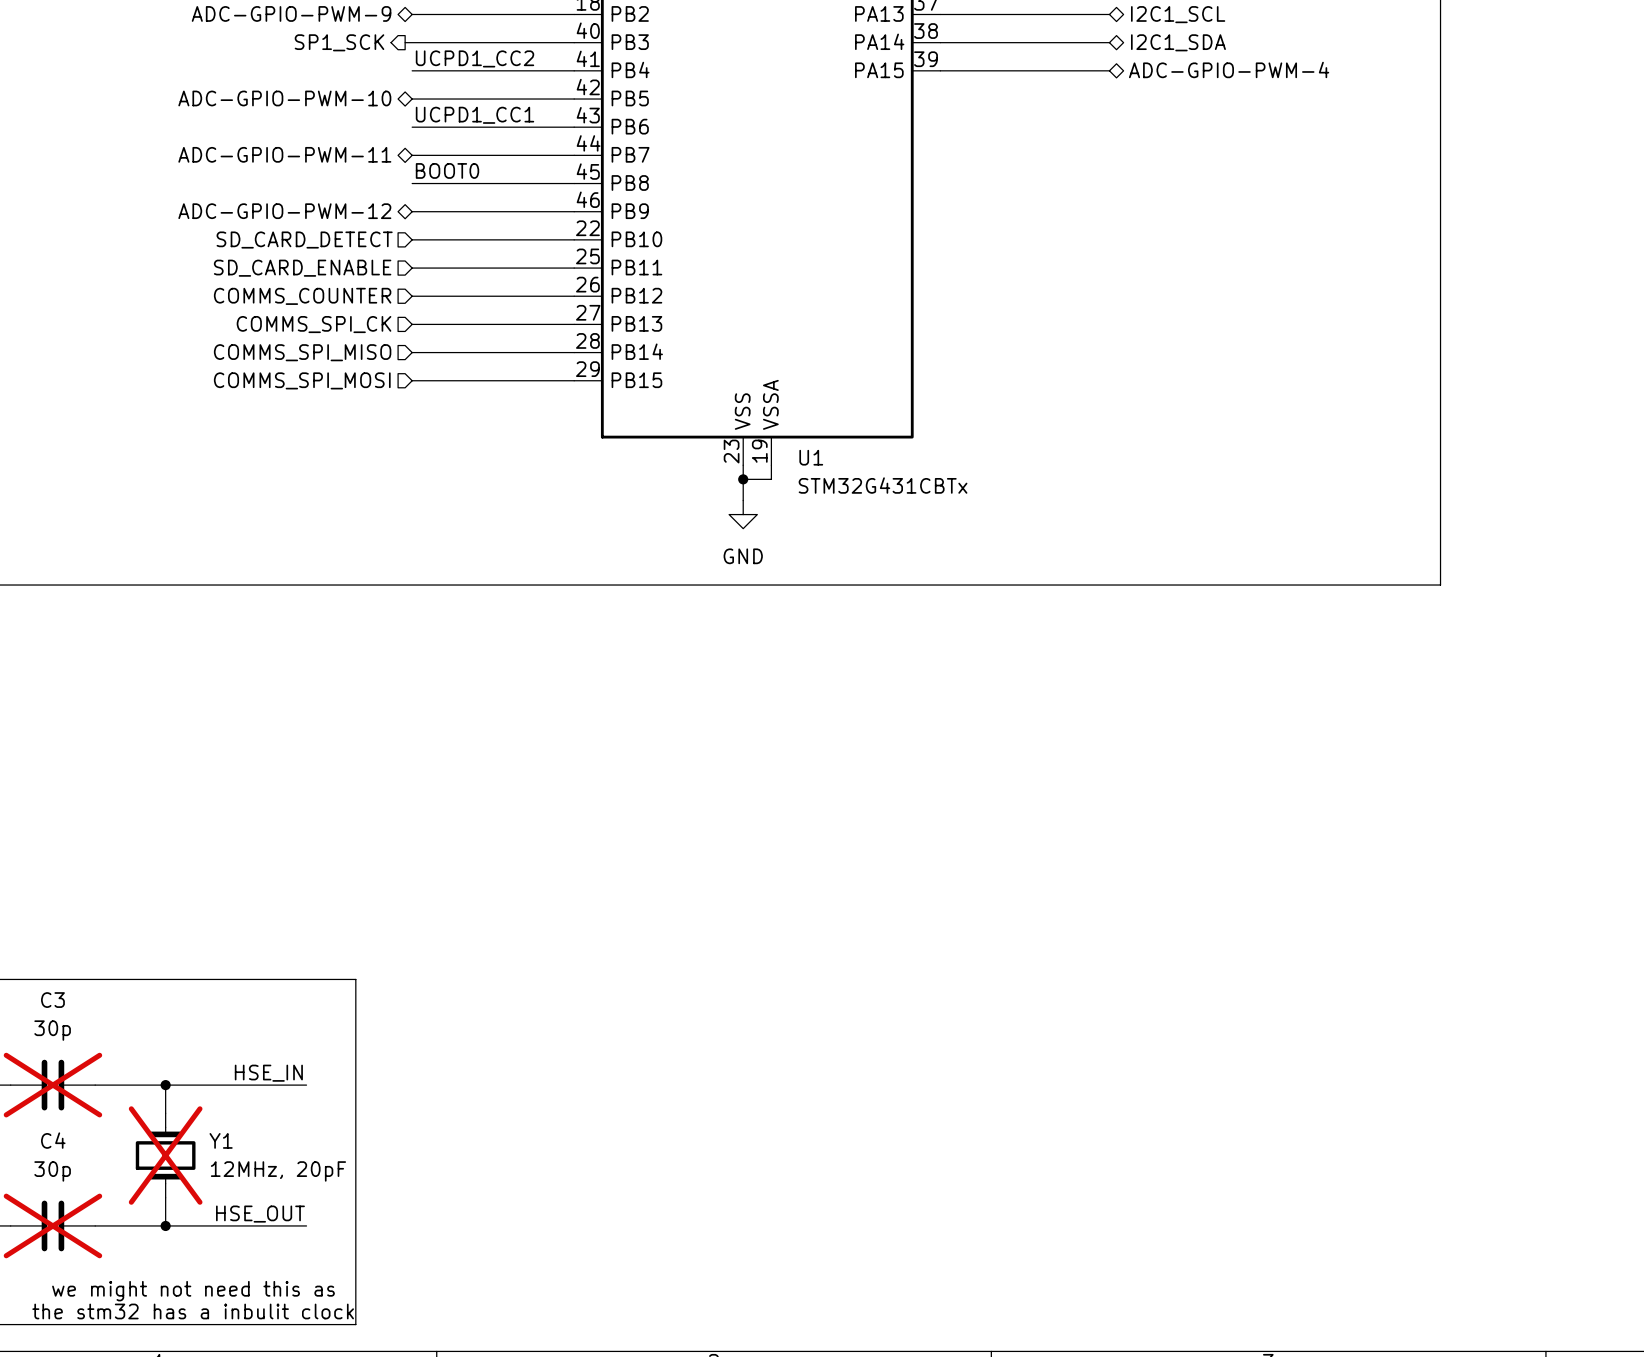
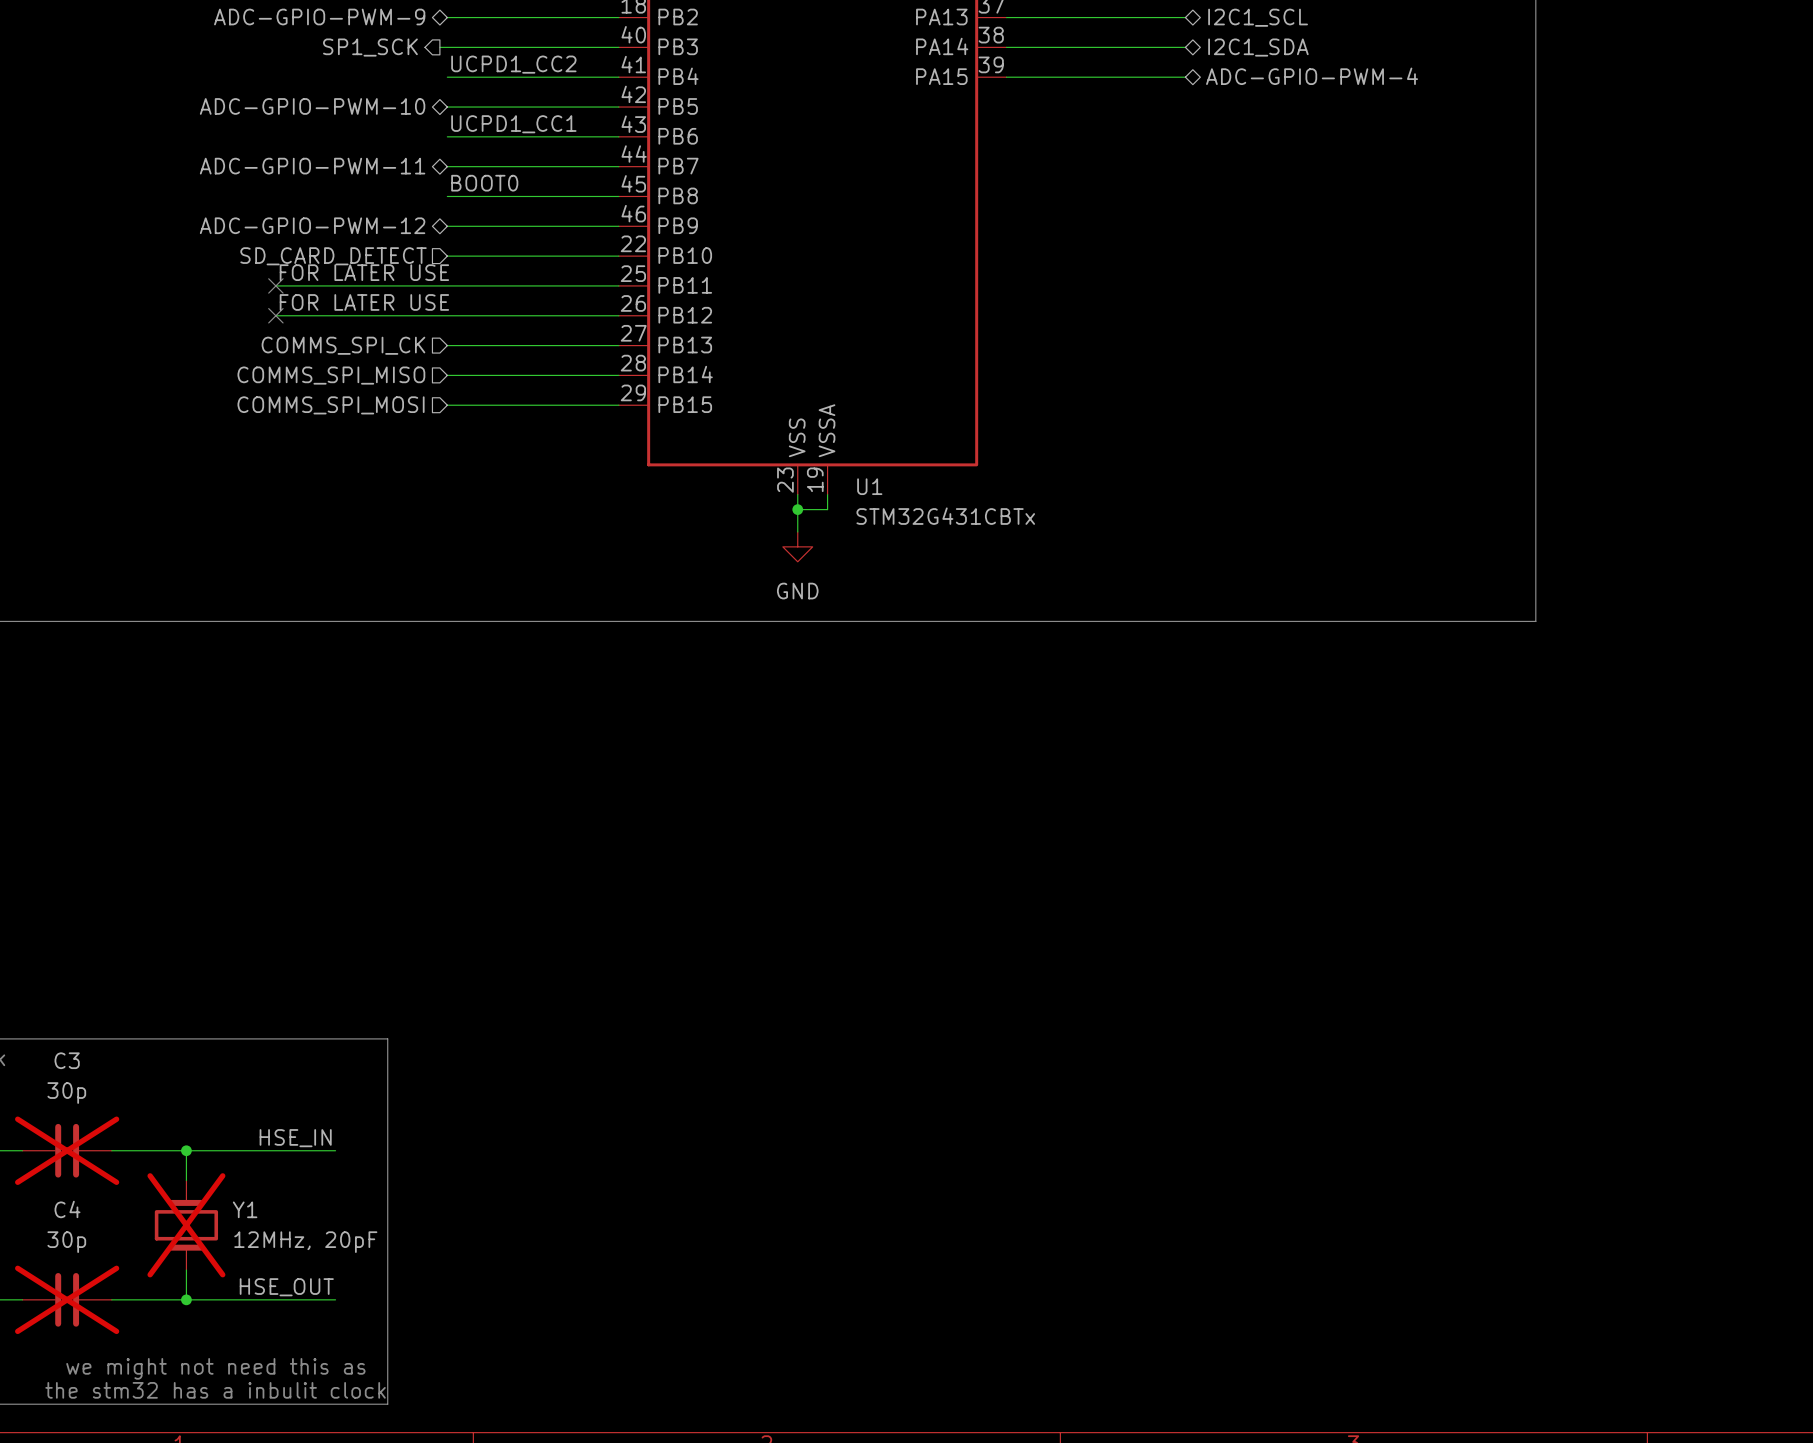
label: none -> FOR LATER USE (364, 272)
wire: none -> (275, 285) (447, 285)
no-connect mark: none -> (275, 285)
hierarchical label: SD_CARD_ENABLE (302, 268) -> none
label: none -> FOR LATER USE (364, 302)
wire: none -> (275, 315) (447, 315)
no-connect mark: none -> (275, 315)
hierarchical label: COMMS_COUNTER (302, 296) -> none

